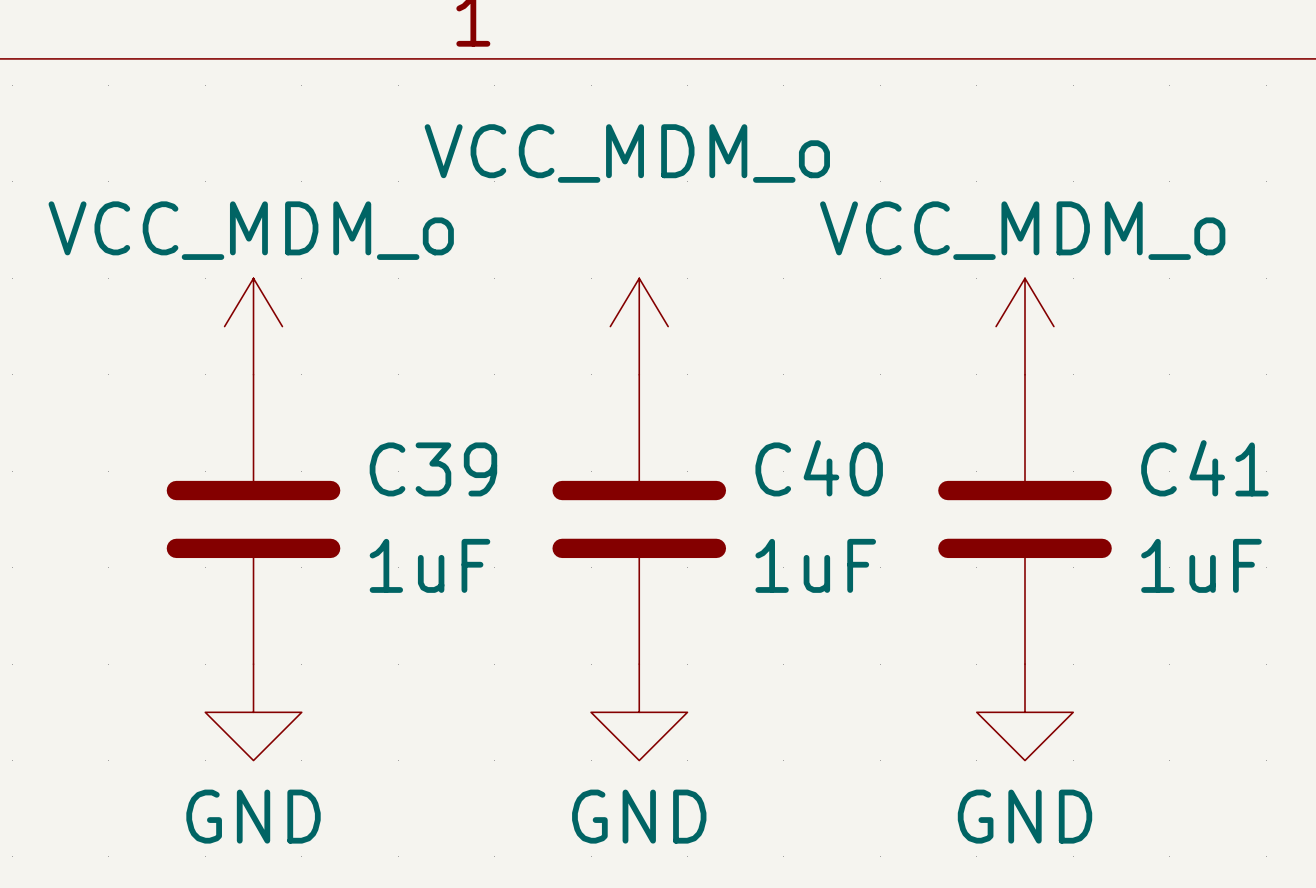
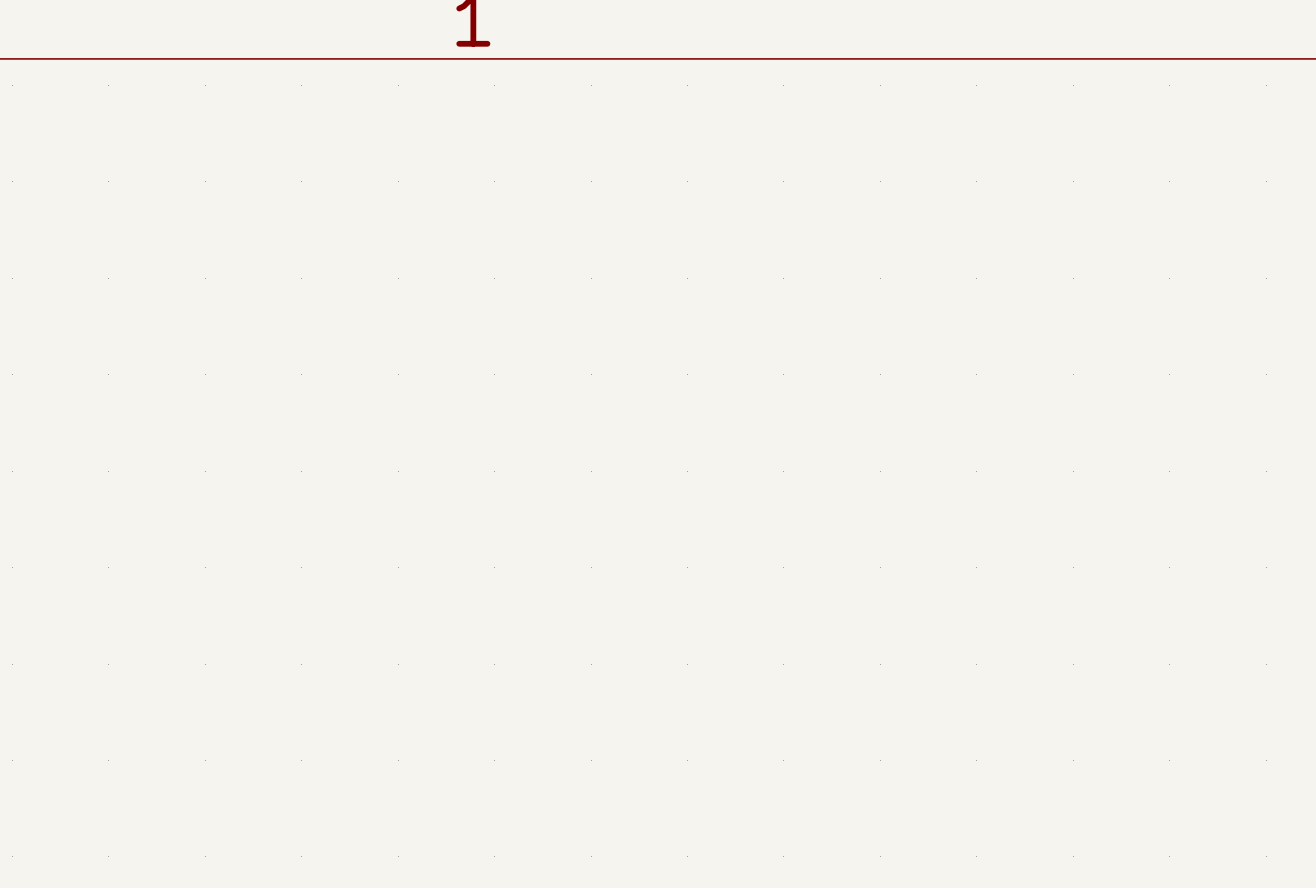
power symbol: VCC_MDM_o (253, 326) -> none
power symbol: VCC_MDM_o (639, 326) -> none
power symbol: VCC_MDM_o (1024, 326) -> none
C39: 1uF (253, 519) -> none
C40: 1uF (639, 519) -> none
C41: 1uF (1024, 519) -> none
power symbol: GND (253, 712) -> none
power symbol: GND (639, 712) -> none
power symbol: GND (1024, 712) -> none

